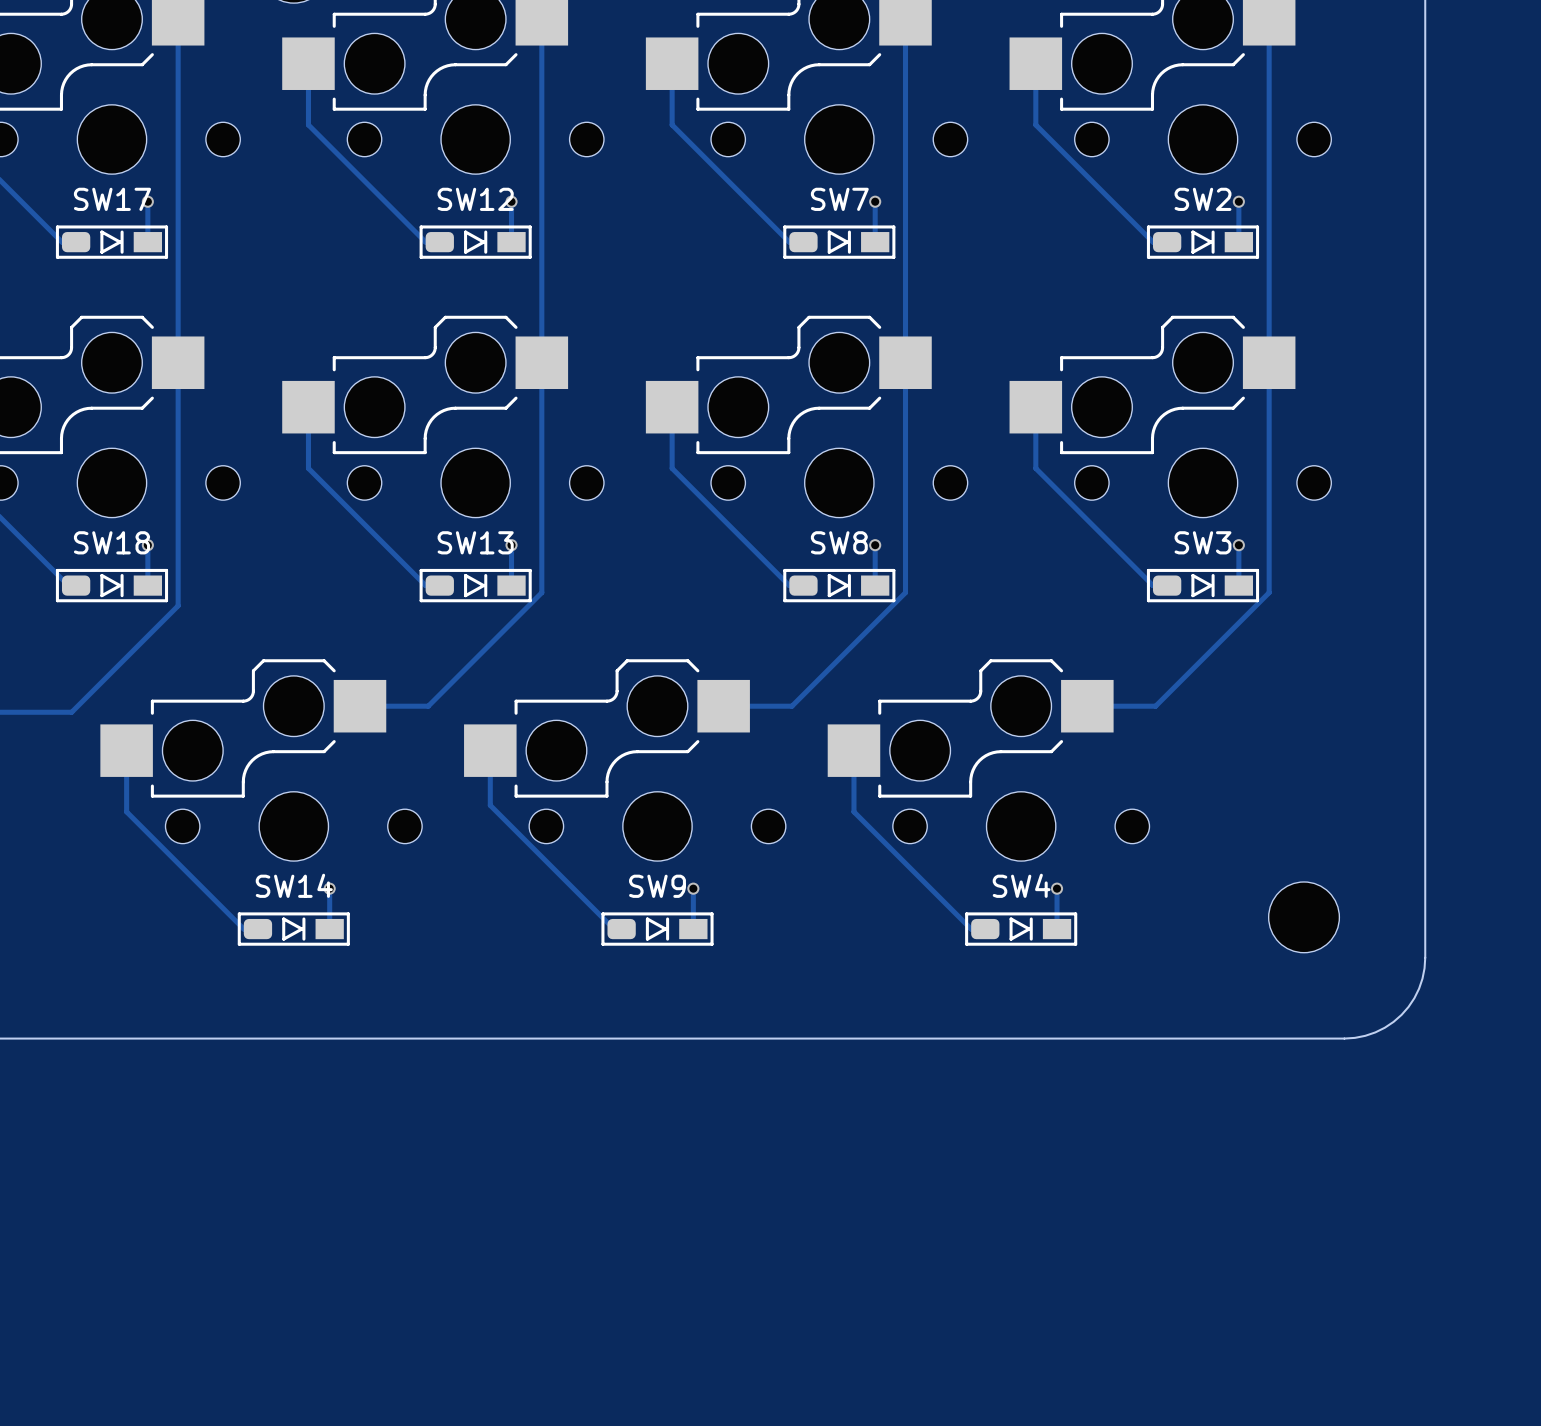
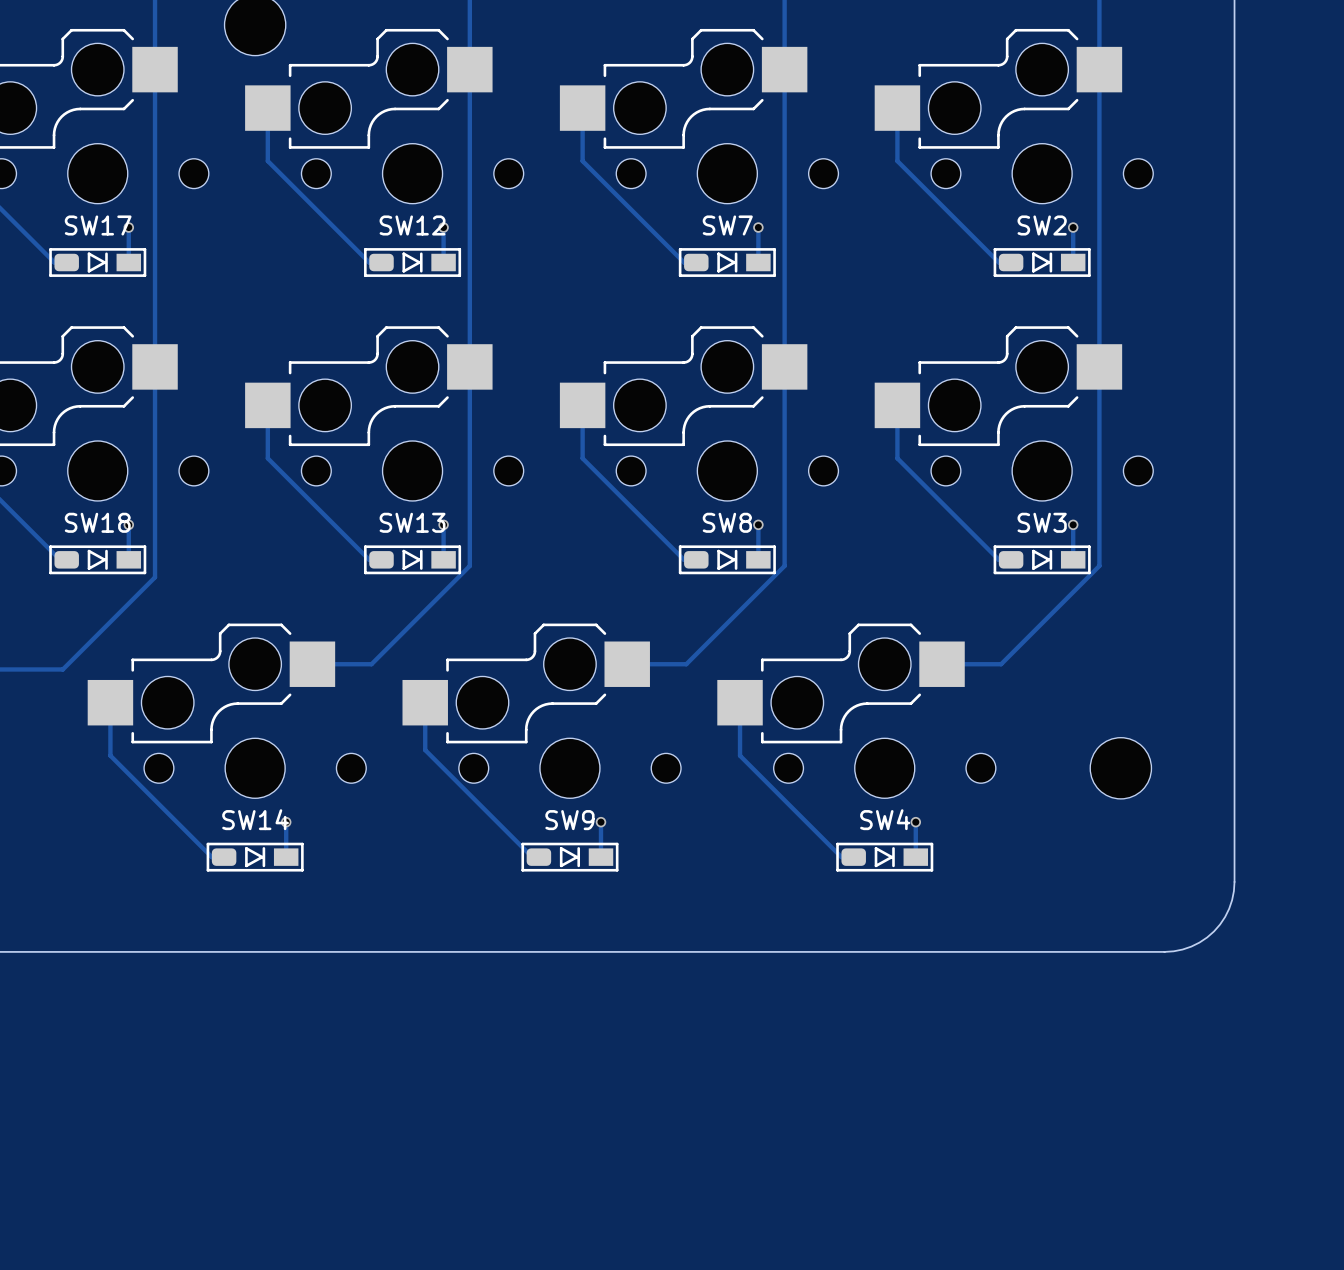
part position: (1304, 917) -> (1120, 768)

